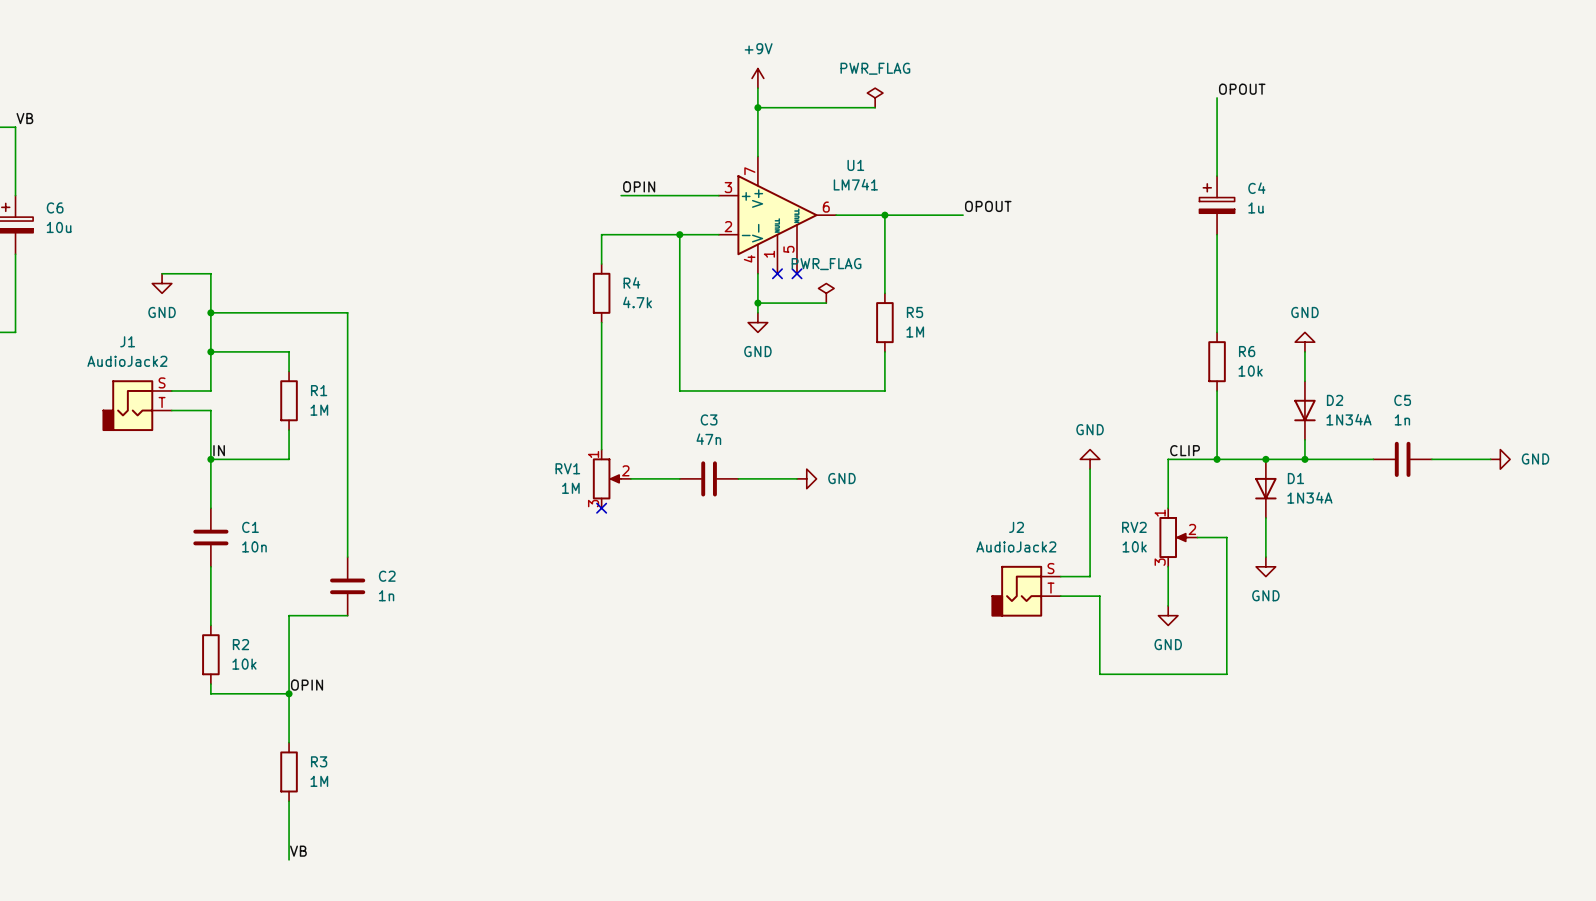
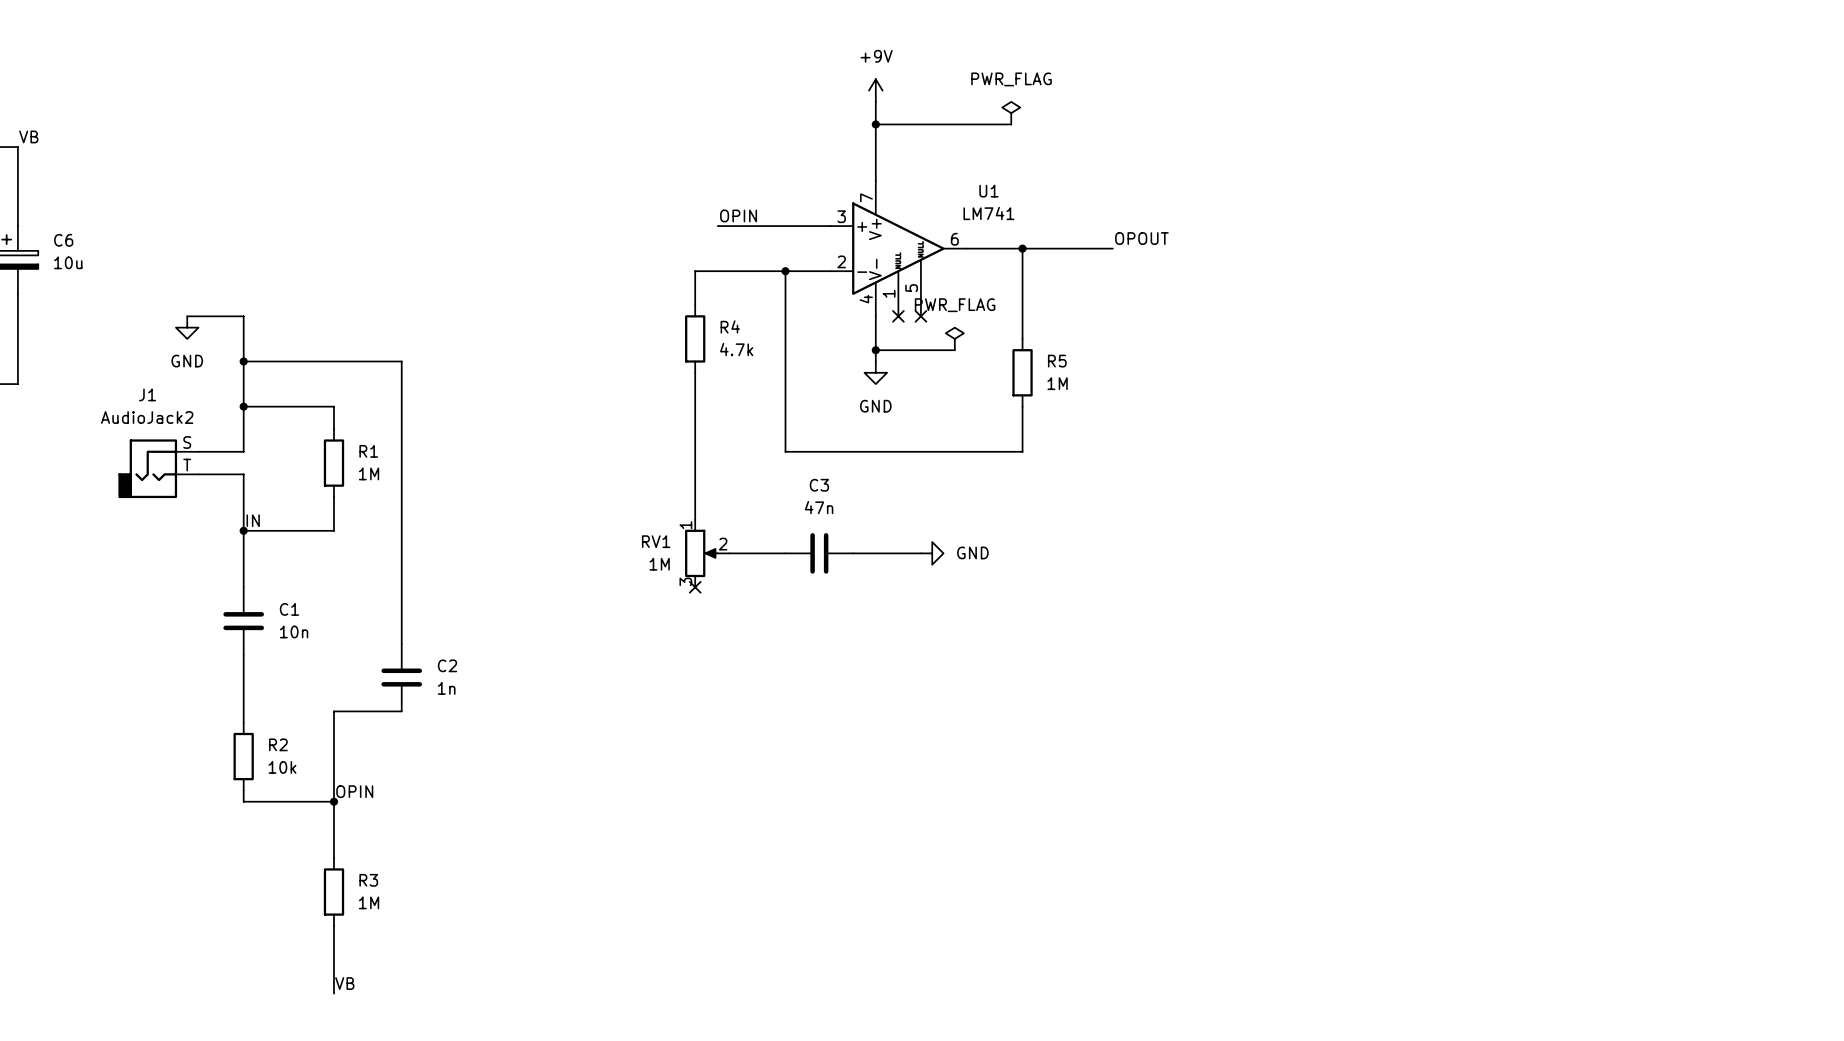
label: OPOUT (1242, 89) -> none
wire: (1217, 97) (1217, 176) -> none
C4: 1u (1217, 205) -> none
wire: (1217, 234) (1217, 332) -> none
power symbol: GND (1304, 342) -> none
wire: (1304, 351) (1304, 381) -> none
R6: 10k (1217, 361) -> none
wire: (1217, 390) (1217, 459) -> none
D2: 1N34A (1304, 410) -> none
wire: (1304, 439) (1304, 459) -> none
label: CLIP (1185, 450) -> none
power symbol: GND (1090, 459) -> none
junction: (1217, 459) -> none
junction: (1265, 459) -> none
junction: (1304, 459) -> none
wire: (1373, 459) (1168, 459) (1168, 508) -> none
C5: 1n (1402, 459) -> none
wire: (1431, 459) (1490, 459) -> none
power symbol: GND (1500, 459) -> none
wire: (1090, 469) (1090, 576) (1060, 576) -> none
D1: 1N34A (1265, 488) -> none
wire: (1265, 517) (1265, 557) -> none
RV2: 10k (1178, 537) -> none
wire: (1197, 537) (1226, 537) (1226, 674) (1099, 674) (1099, 596) (1060, 596) -> none
wire: (1168, 566) (1168, 605) -> none
power symbol: GND (1265, 566) -> none
J2: AudioJack2 (1026, 591) -> none
power symbol: GND (1168, 615) -> none

